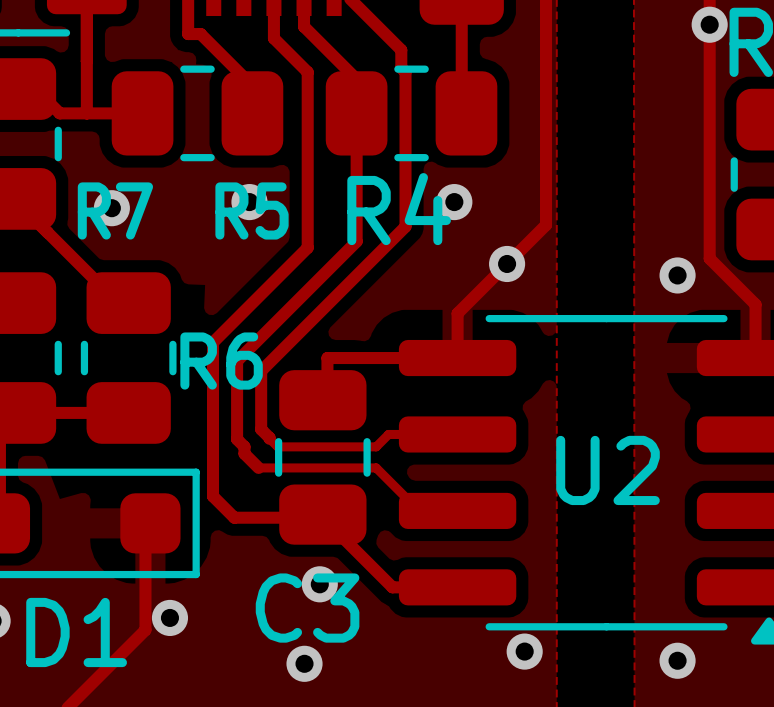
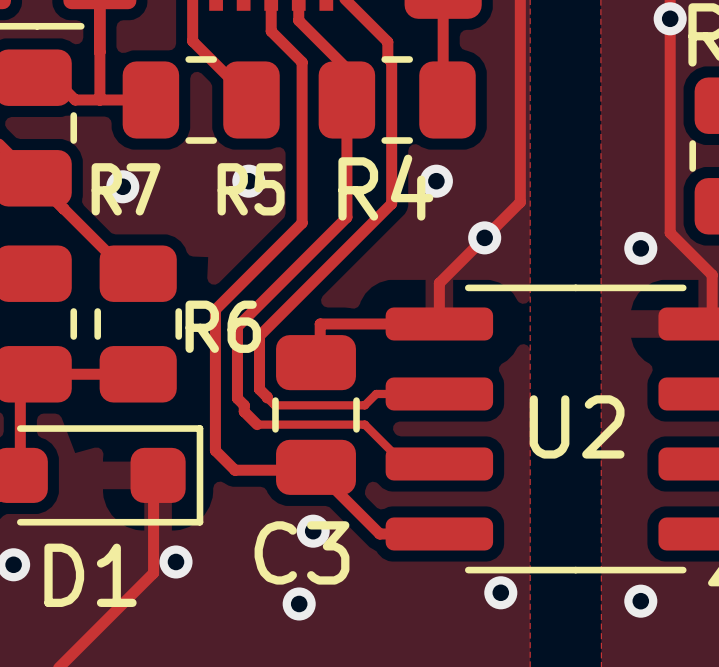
track: (188, 34) (200, 34) (252, 85) (252, 113) -> (192, 27) (192, 41) (251, 99)

